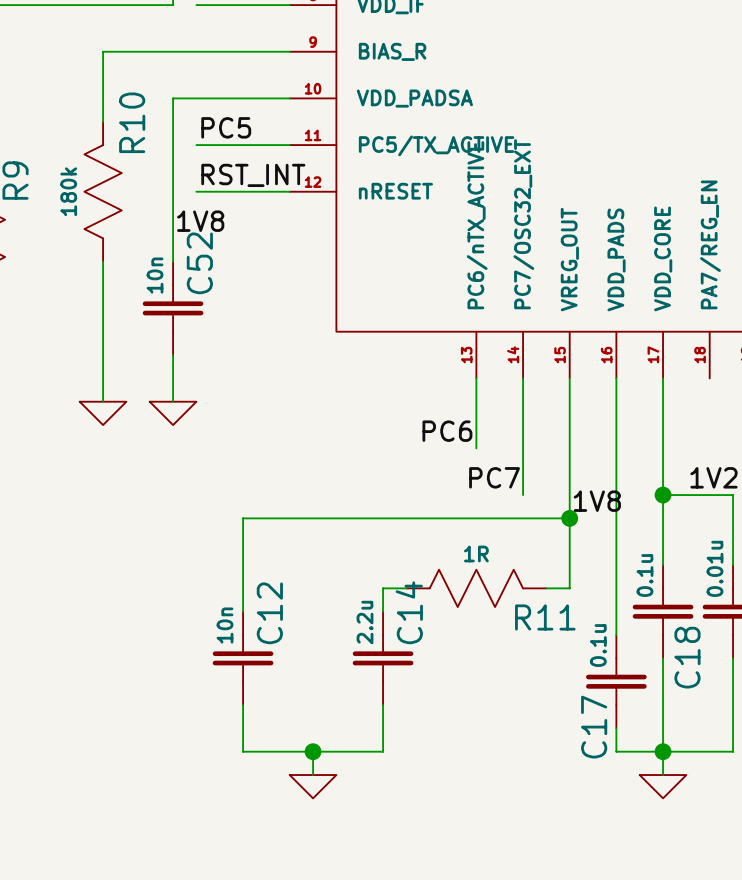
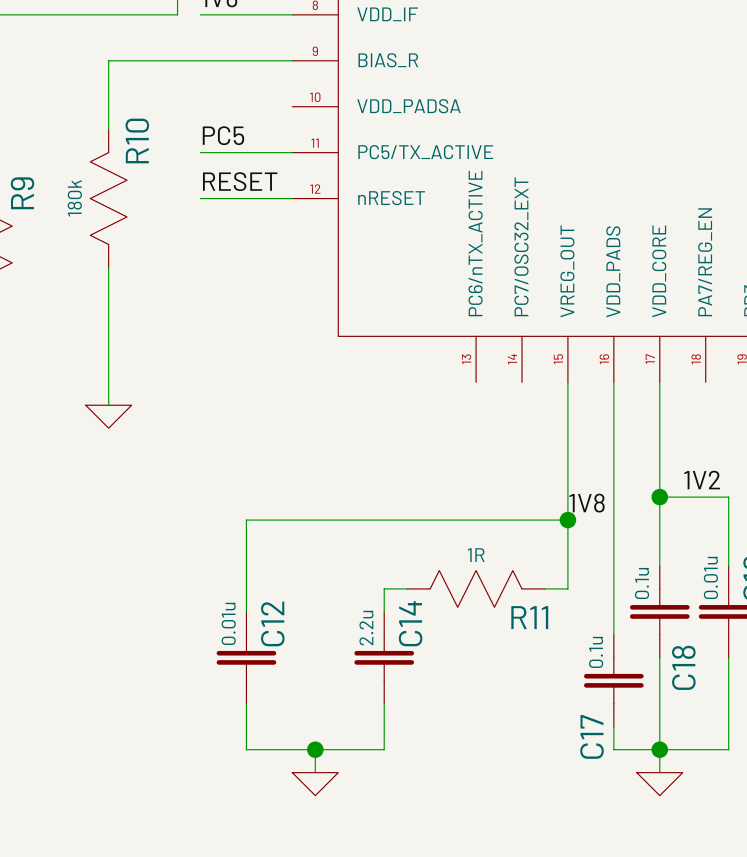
wire: (289, 98) (173, 98) (173, 261) -> none
label: RST_INT (253, 175) -> RESET (240, 181)
label: 1V8 (200, 221) -> none
C52: 10n (173, 308) -> none
wire: (173, 355) (173, 401) -> none
wire: (476, 378) (476, 448) -> none
wire: (523, 378) (523, 495) -> none
power symbol: (173, 413) -> none
label: PC6 (447, 431) -> none
label: PC7 (494, 477) -> none
C12 value: 10n (225, 625) -> 0.01u (228, 623)

